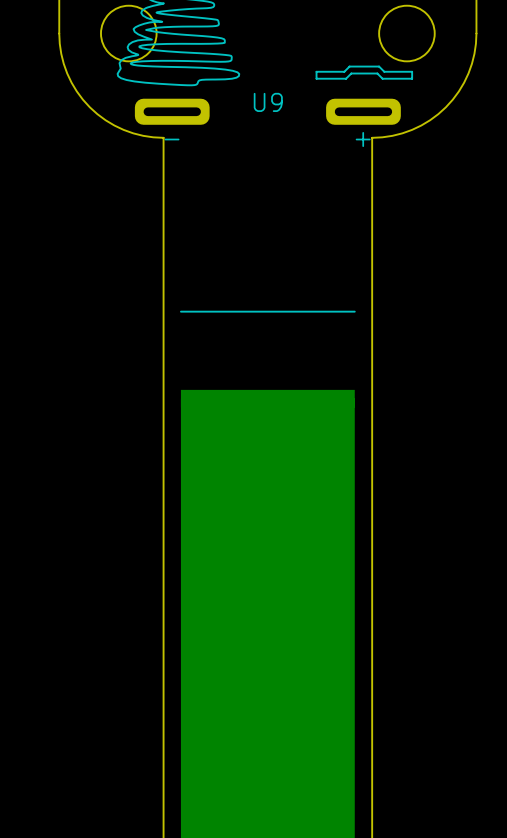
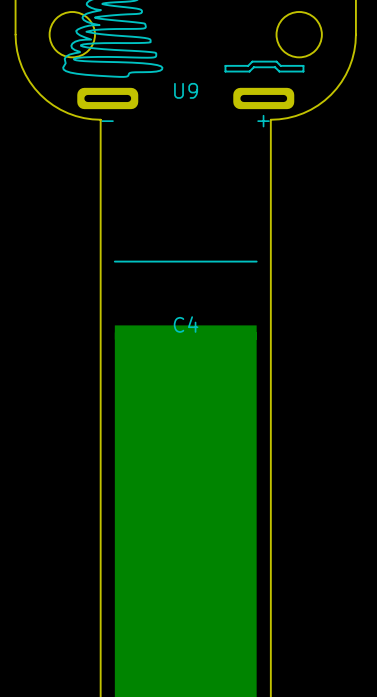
C4 name: none -> C4 (186, 324)

